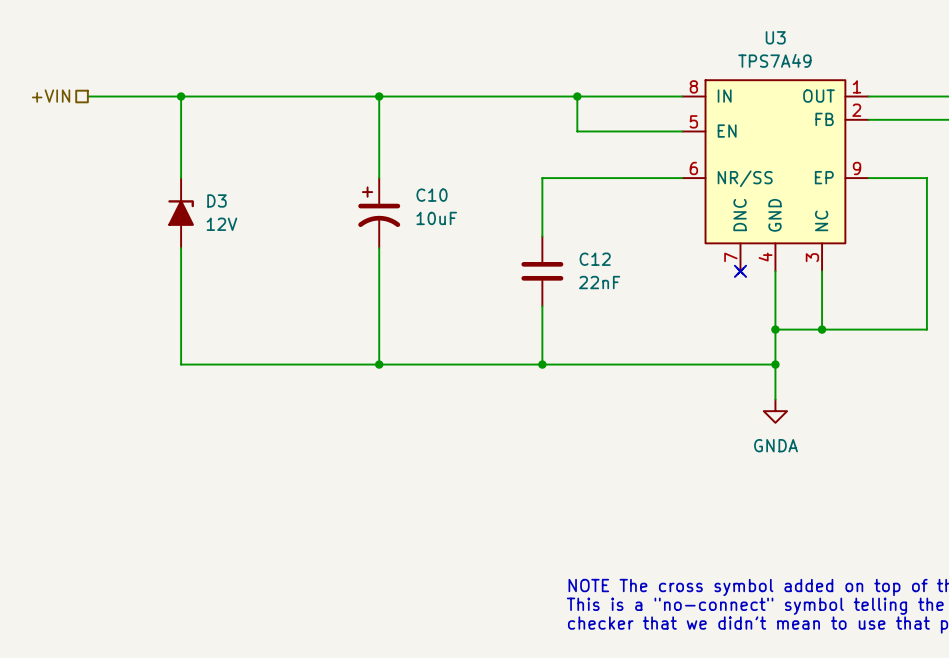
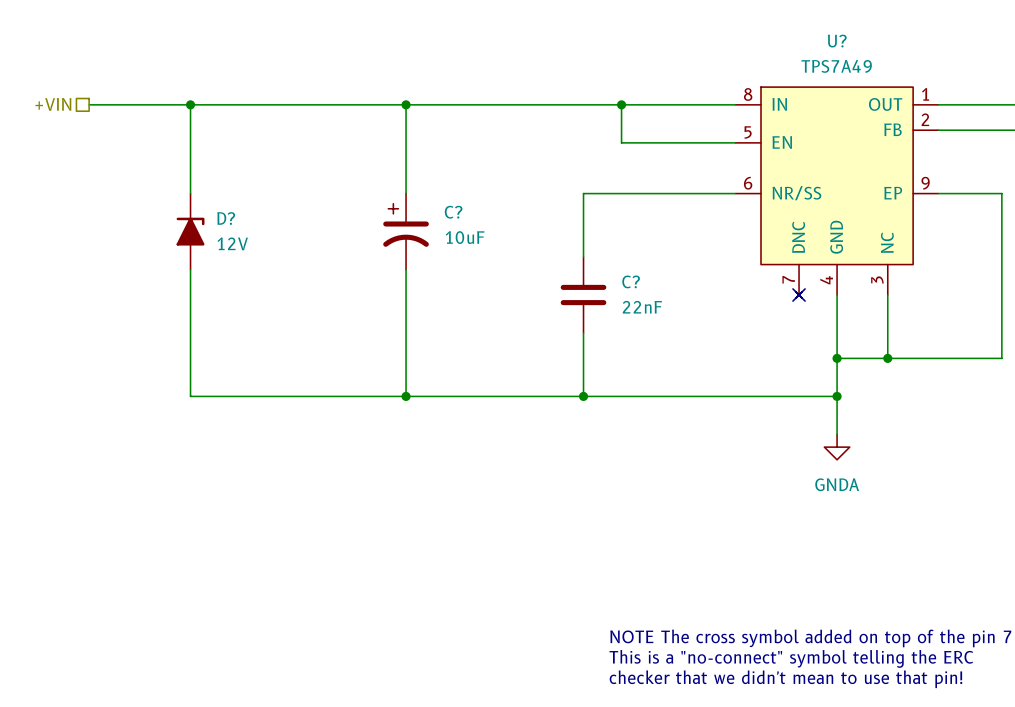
U3 name: U3 (775, 37) -> U? (837, 41)
C10 name: C10 (432, 195) -> C? (453, 212)
D3 name: D3 (216, 200) -> D? (226, 218)
C12 name: C12 (595, 259) -> C? (631, 281)

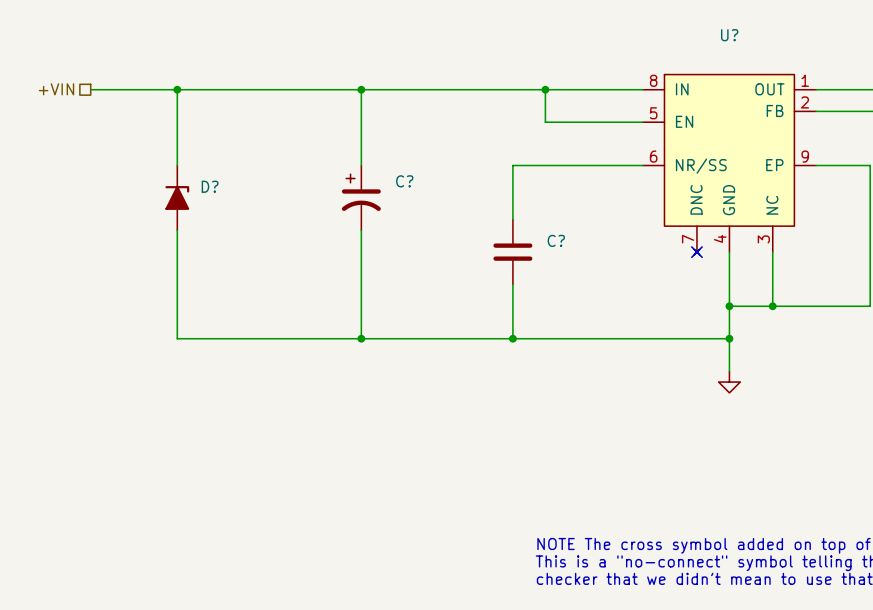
U? value: TPS7A49 (836, 66) -> none
C? value: 10uF (465, 237) -> none
D? value: 12V (232, 243) -> none
C? value: 22nF (642, 307) -> none
power symbol text: GNDA (837, 484) -> none

